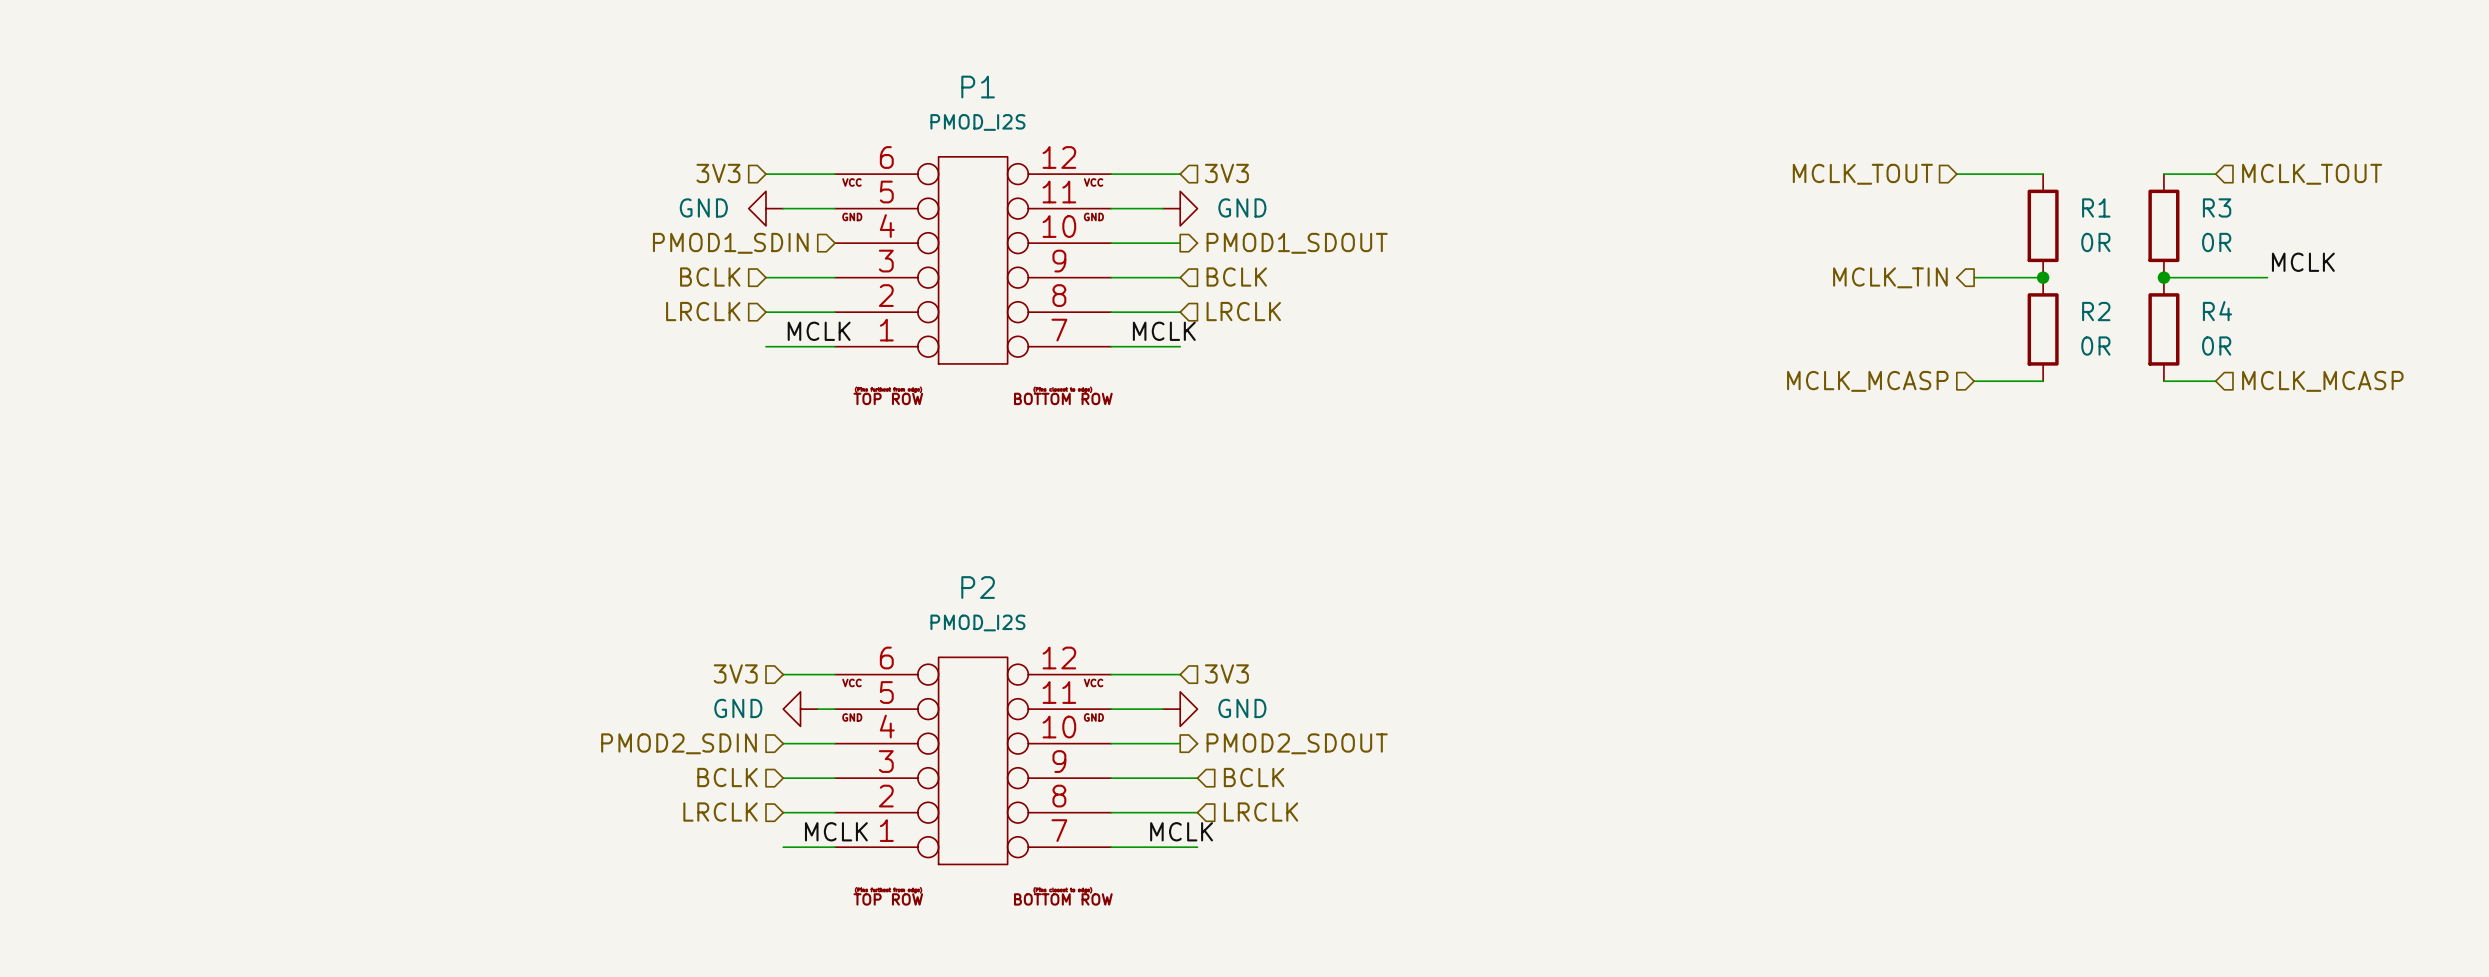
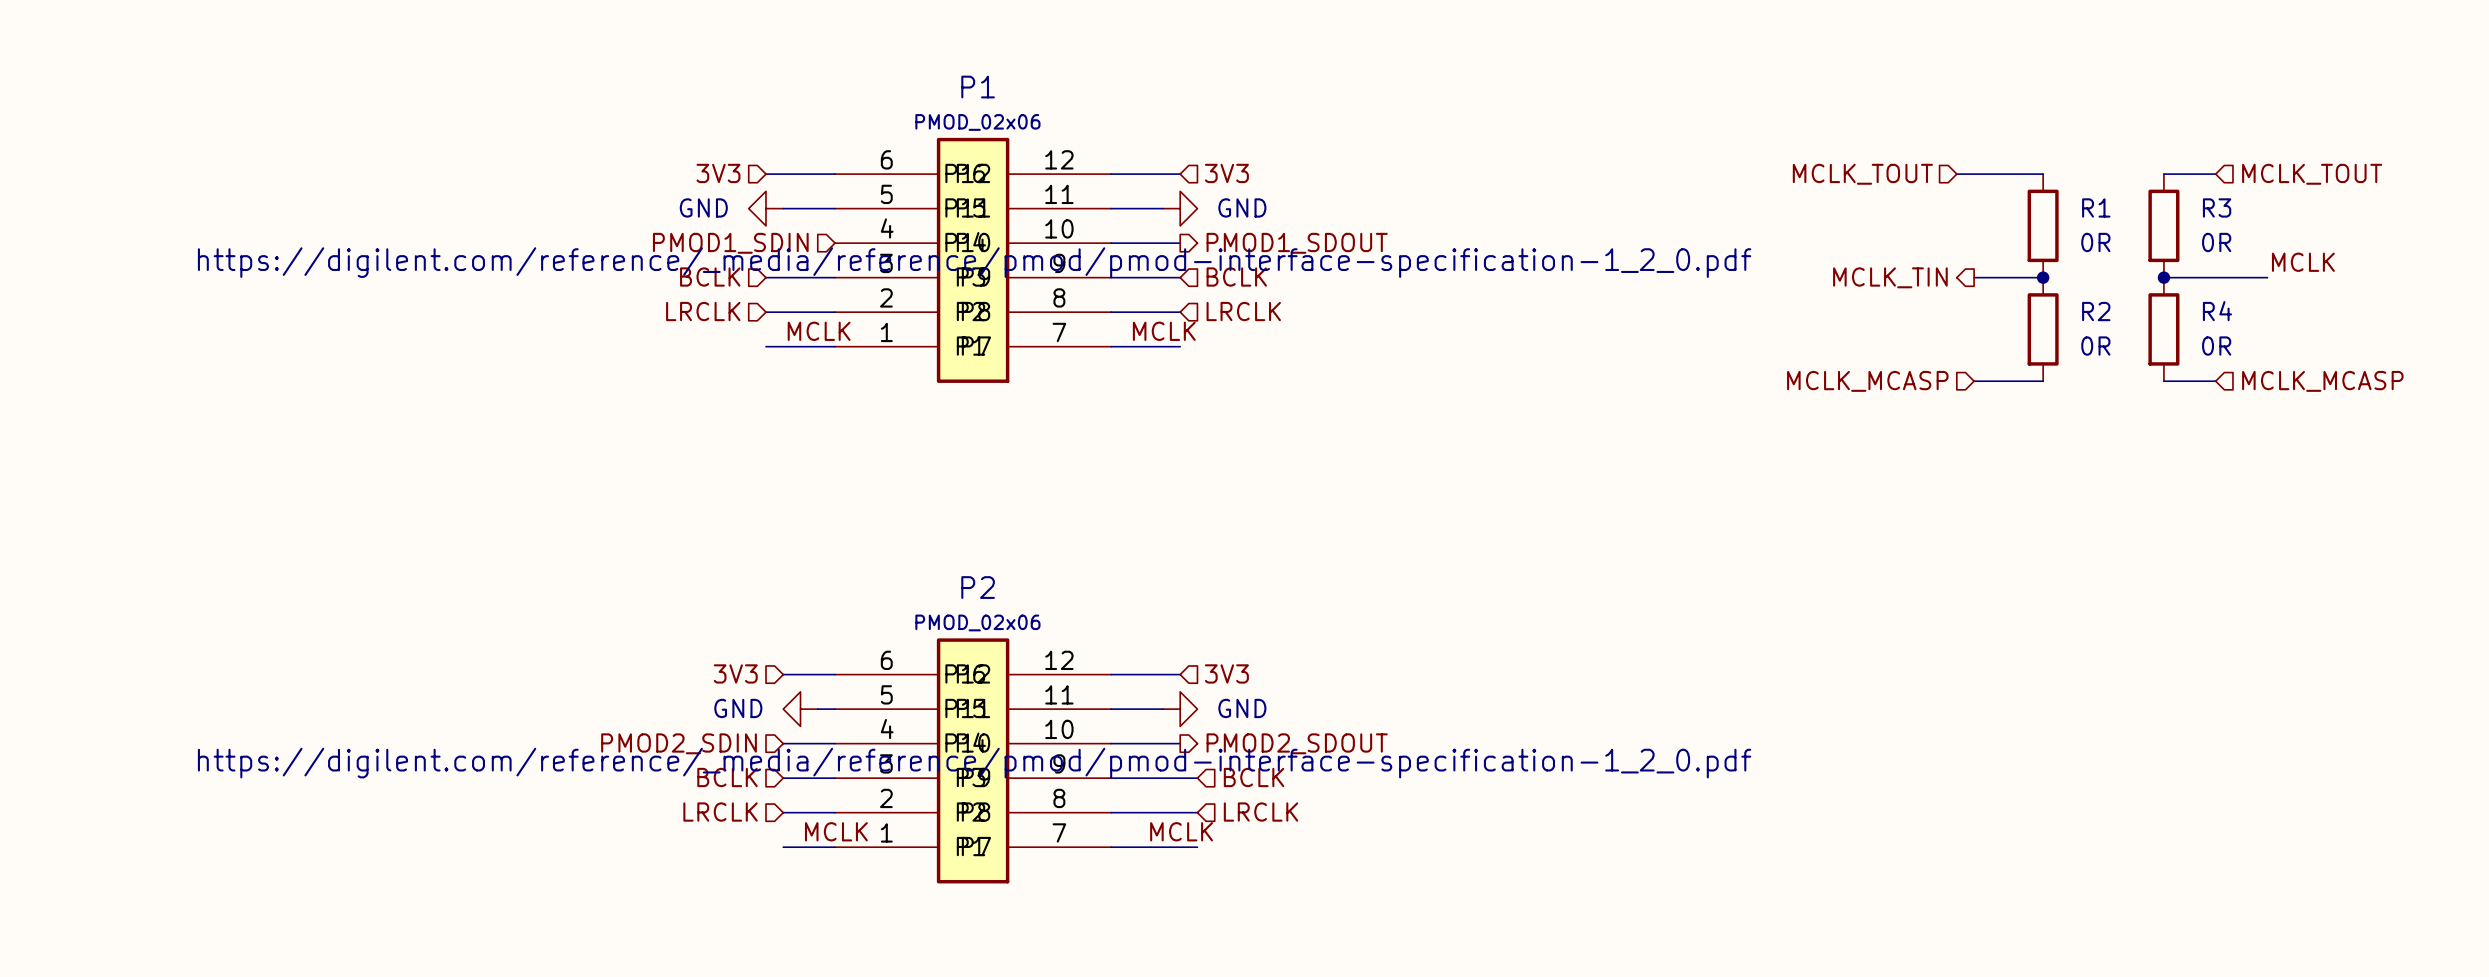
P1 value: PMOD_I2S (977, 122) -> PMOD_02x06 (977, 122)
P1 symbol: [835, 156, 1112, 364] -> [835, 137, 1112, 383]
P1 text: none -> https://digilent.com/reference/_media/reference/pmod/pmod-interface-specification-1_2_0.pdf (974, 262)
P2 value: PMOD_I2S (977, 622) -> PMOD_02x06 (977, 622)
P2 symbol: [835, 657, 1112, 865] -> [835, 638, 1112, 884]
P2 text: none -> https://digilent.com/reference/_media/reference/pmod/pmod-interface-specification-1_2_0.pdf (974, 763)

